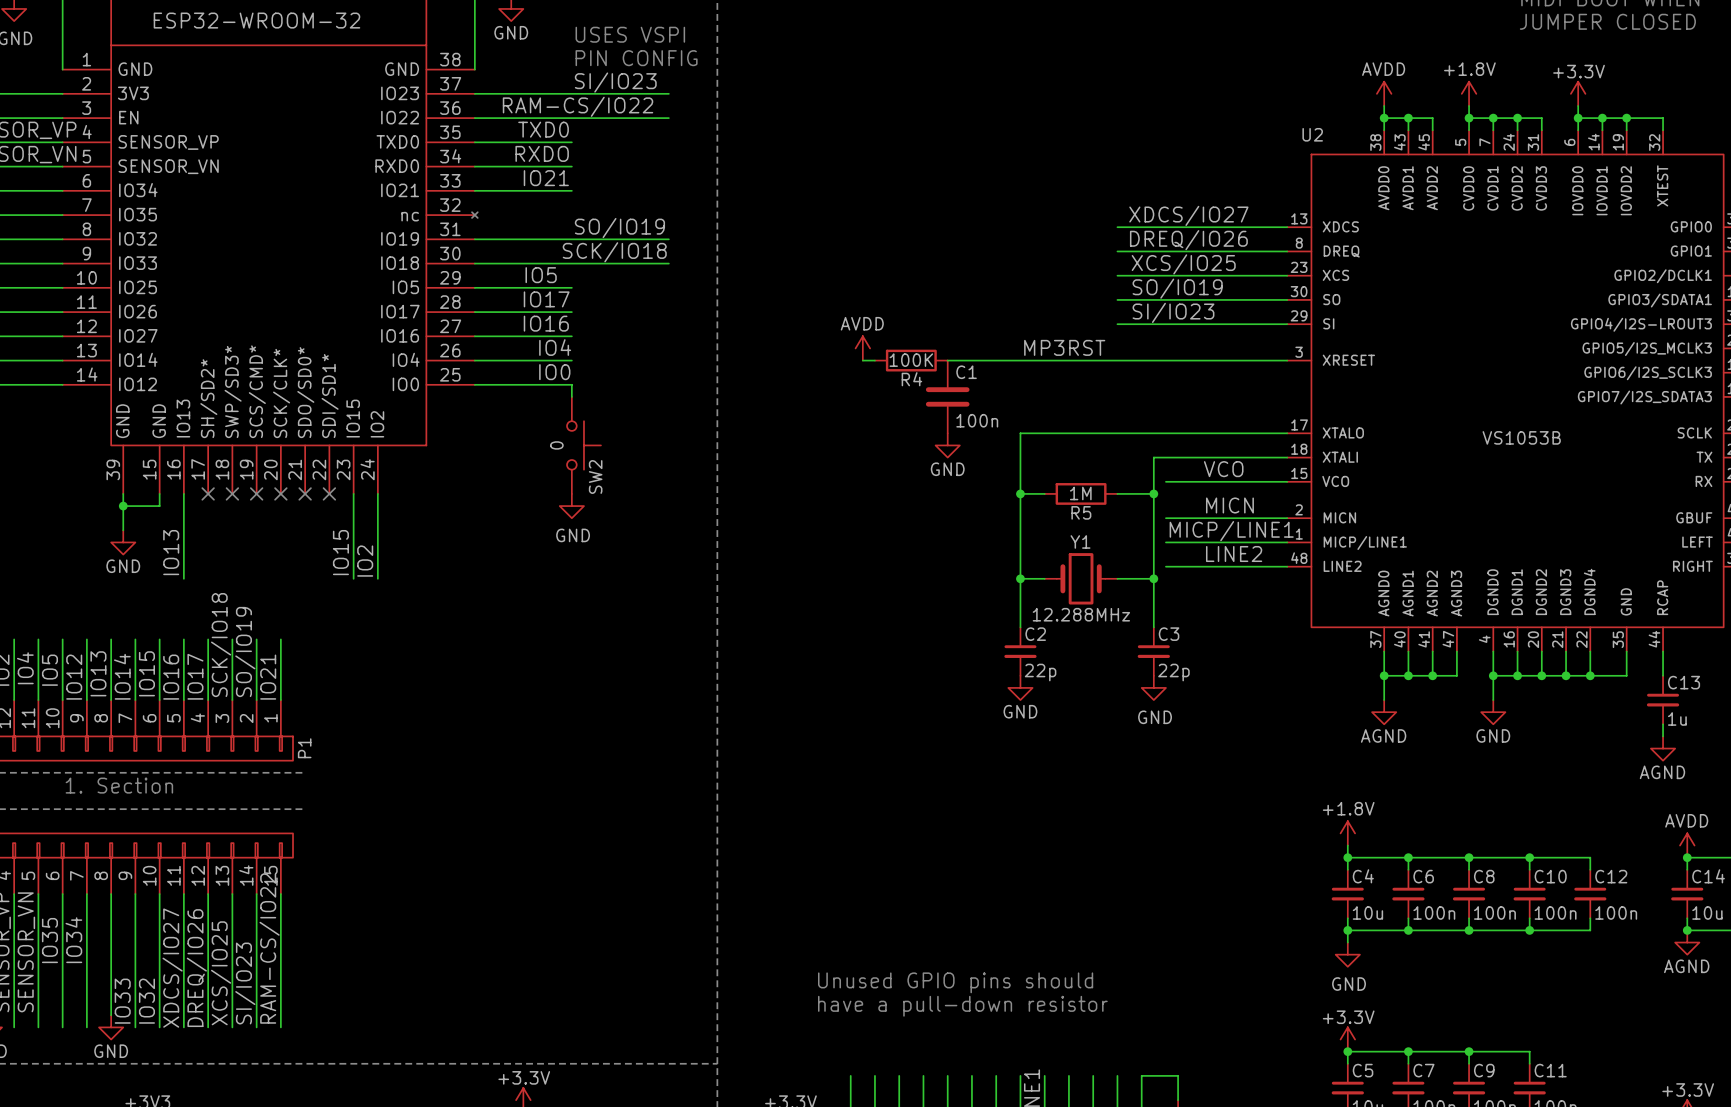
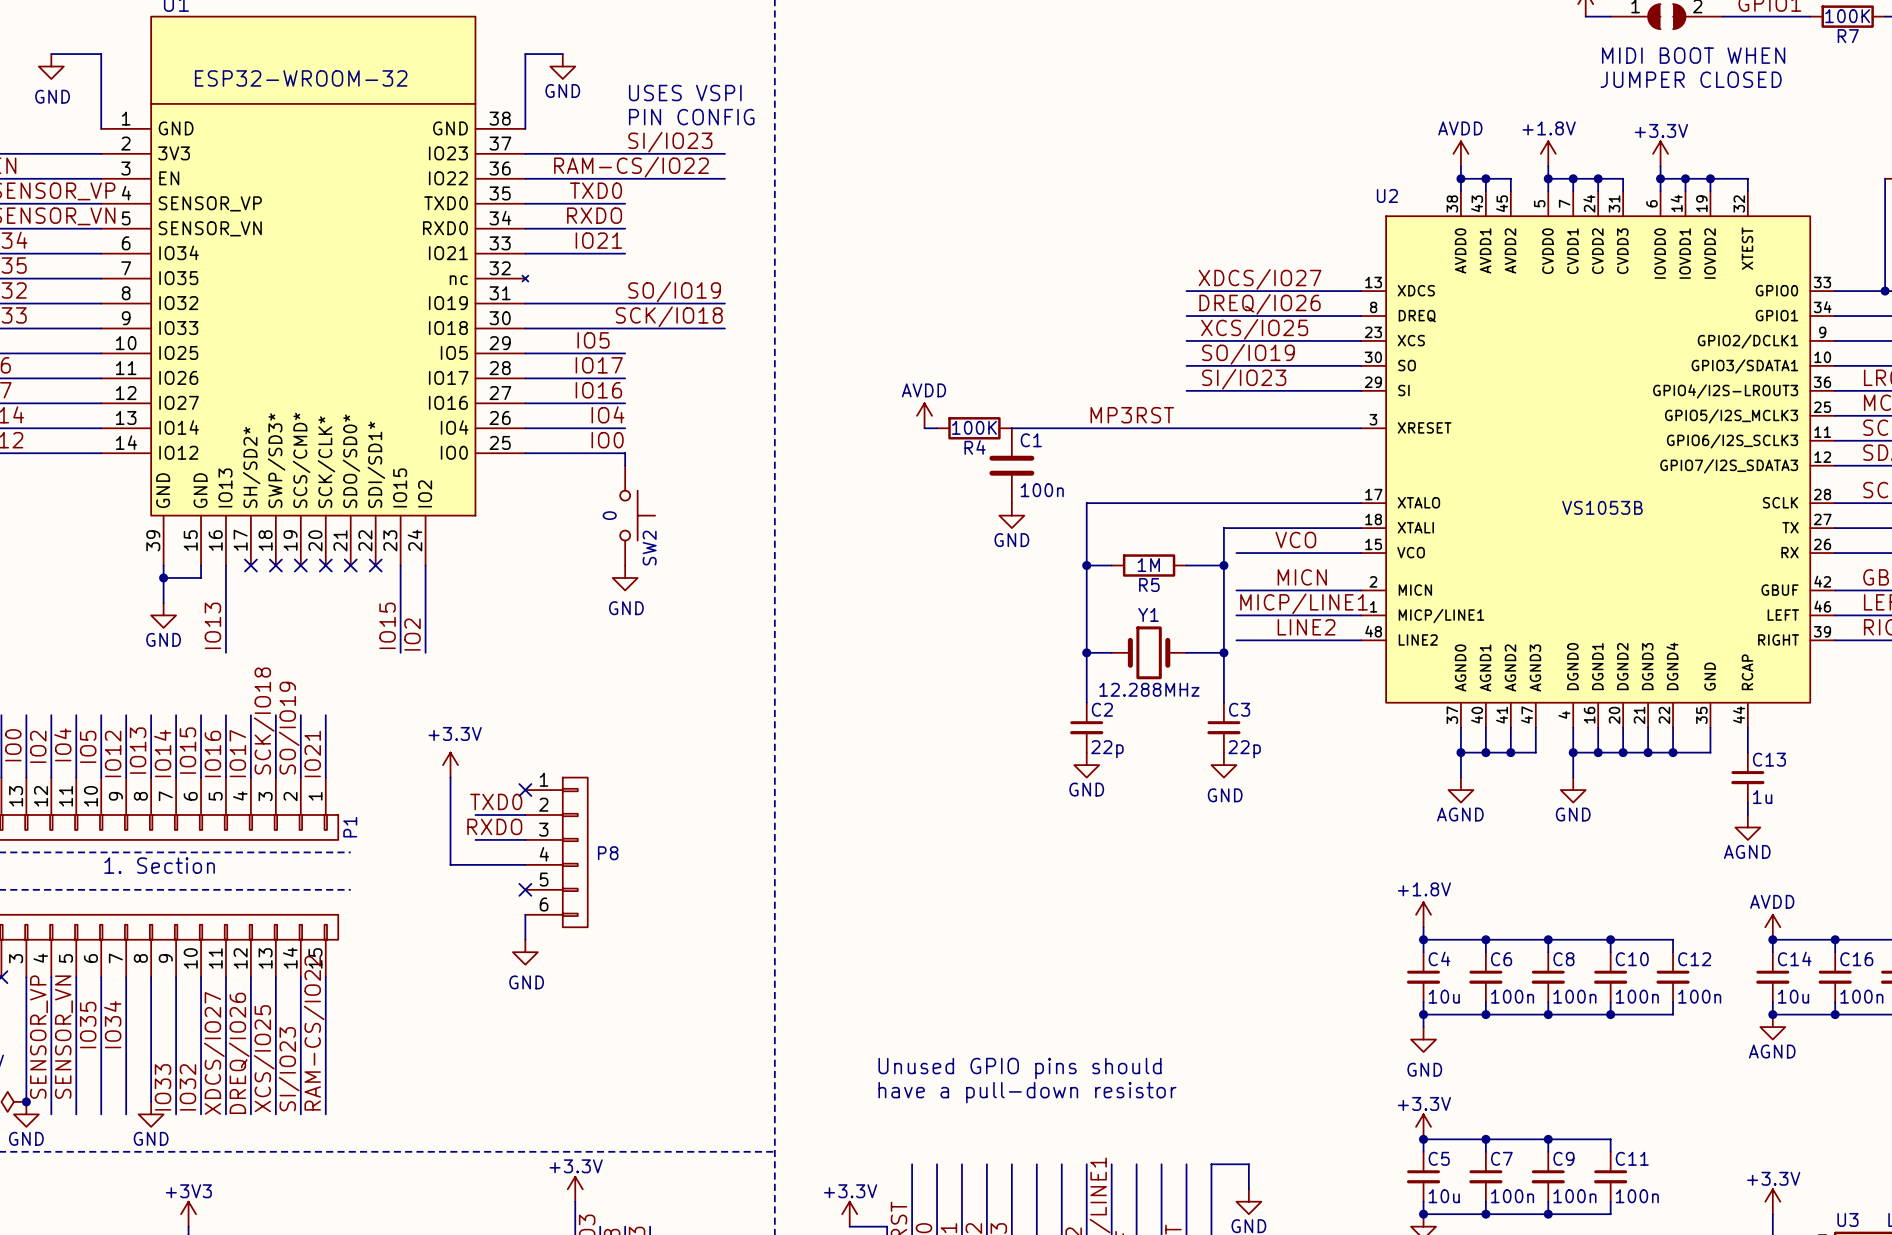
power symbol: none -> +3.3V (450, 765)
wire: none -> (450, 777) (450, 864) (525, 864)
no-connect mark: none -> (525, 790)
label: none -> TXD0 (496, 801)
wire: none -> (475, 815) (525, 815)
label: none -> RXDO (494, 826)
wire: none -> (475, 839) (525, 839)
P8: none -> (556, 852)
no-connect mark: none -> (525, 889)
wire: none -> (525, 914) (525, 939)
power symbol: none -> GND (525, 952)

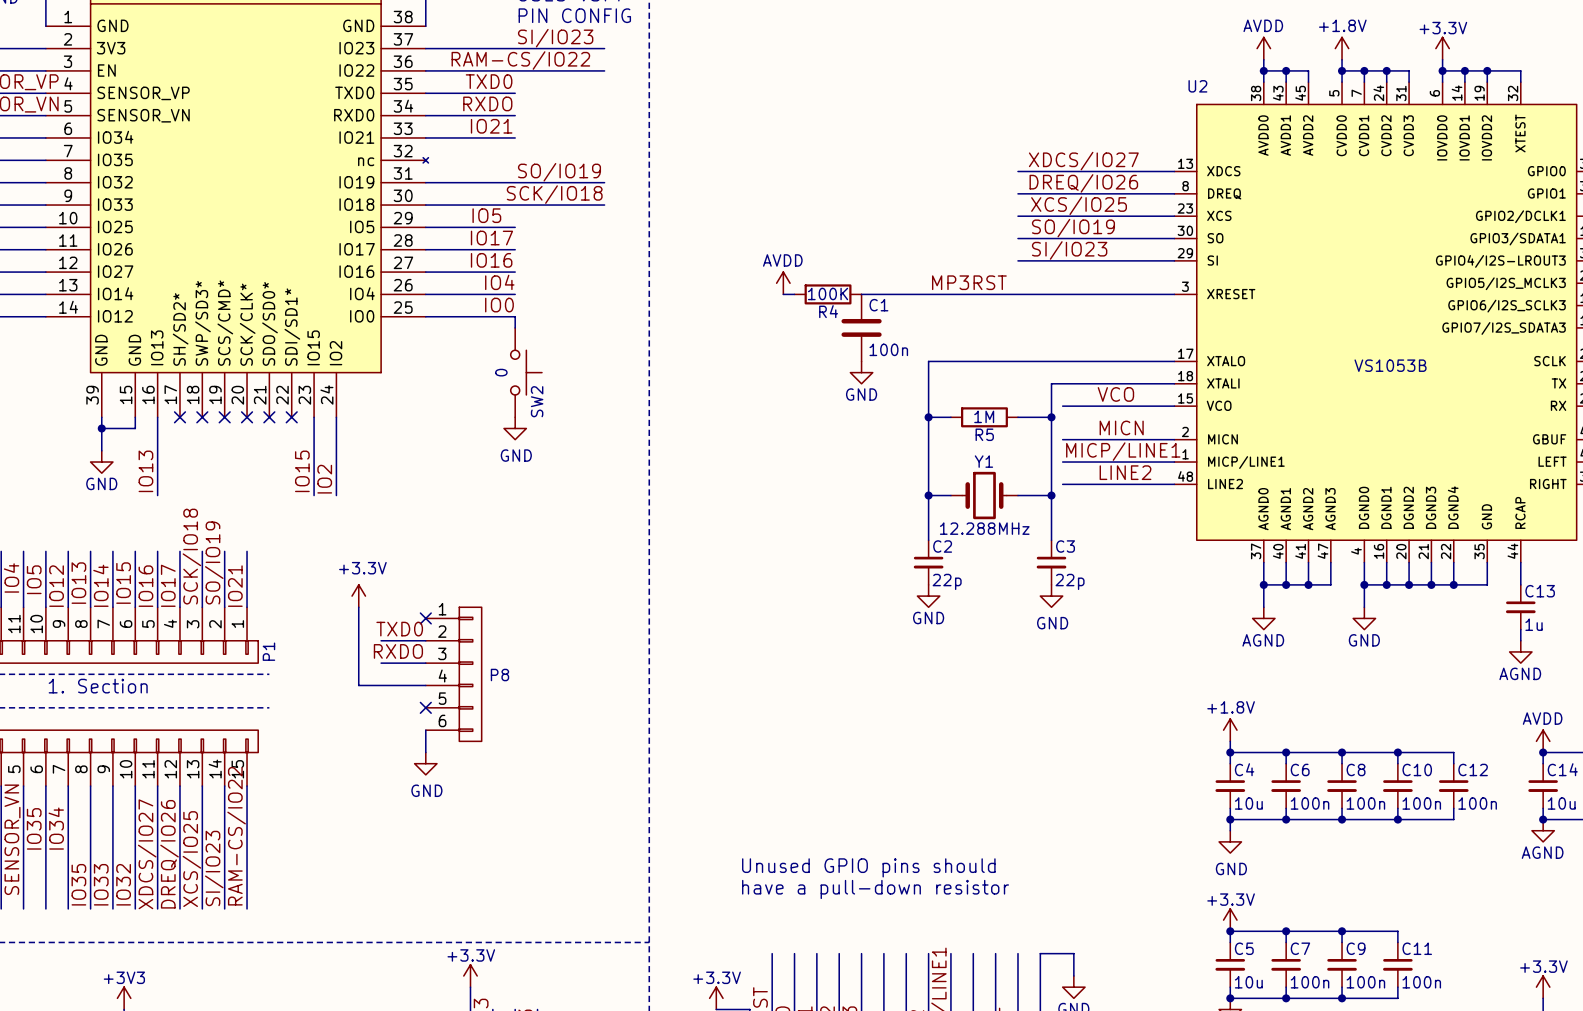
label: none -> IO35 (78, 884)
power symbol: GND (151, 1114) -> none

